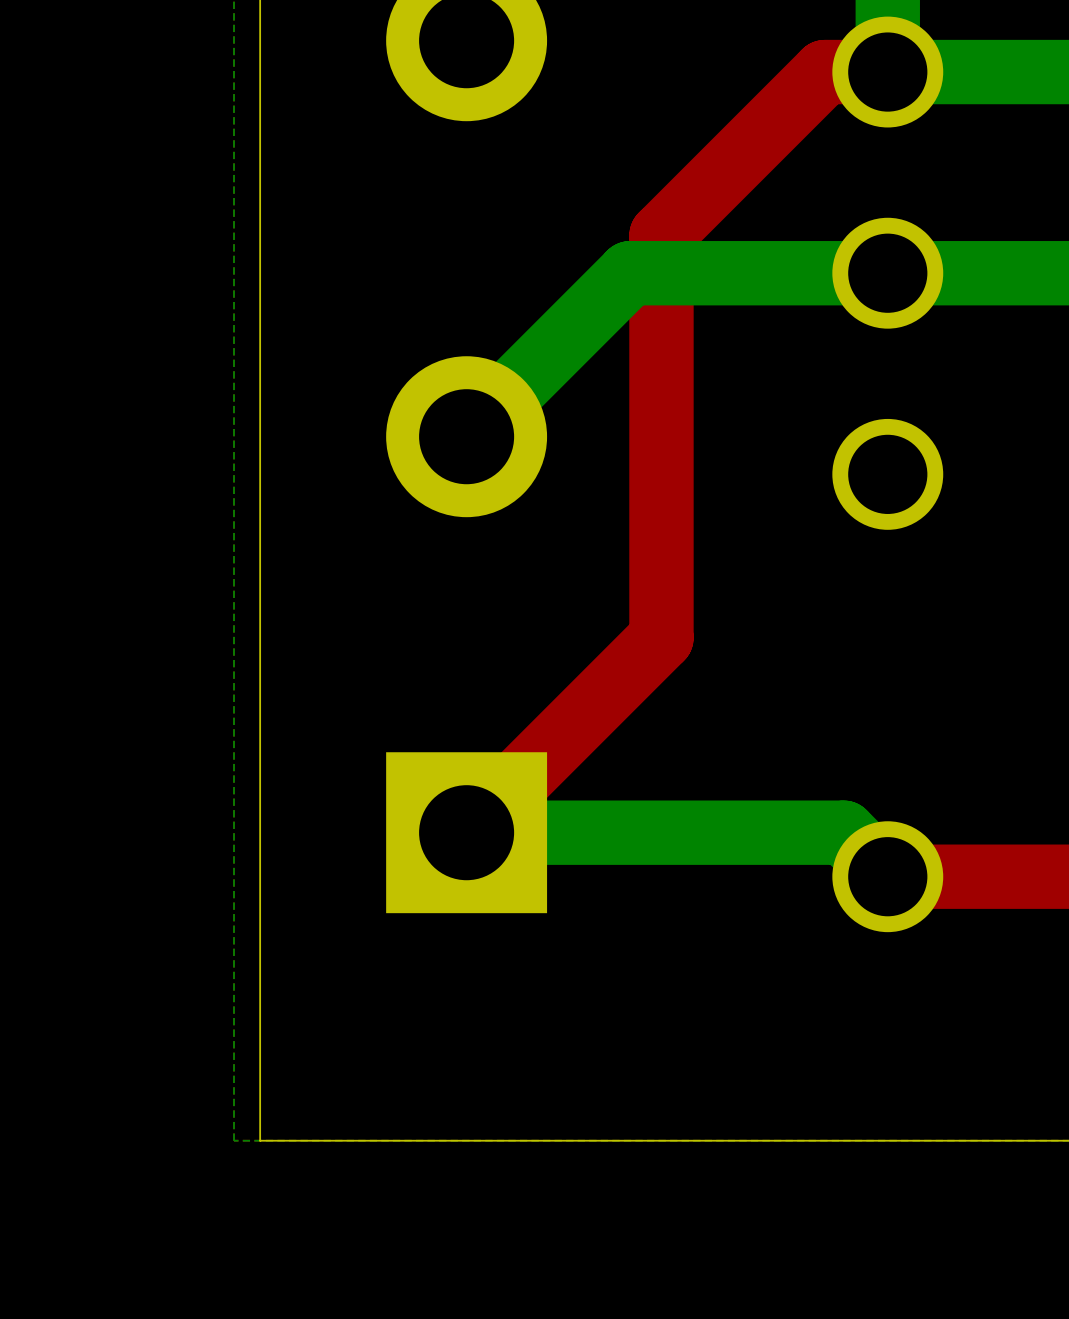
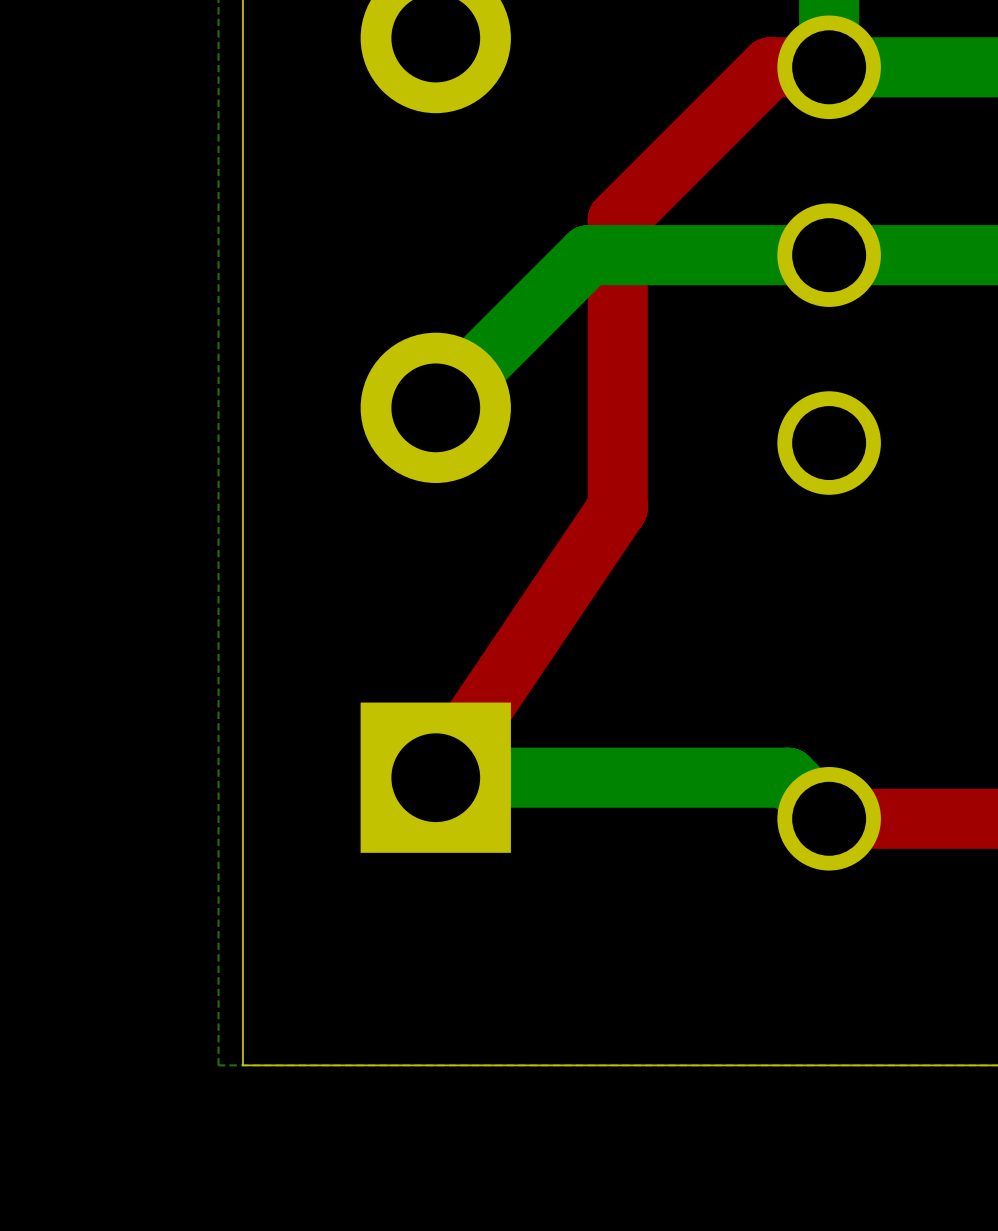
top track: (661, 543) (661, 637) (466, 832) -> (617, 507) (435, 777)

